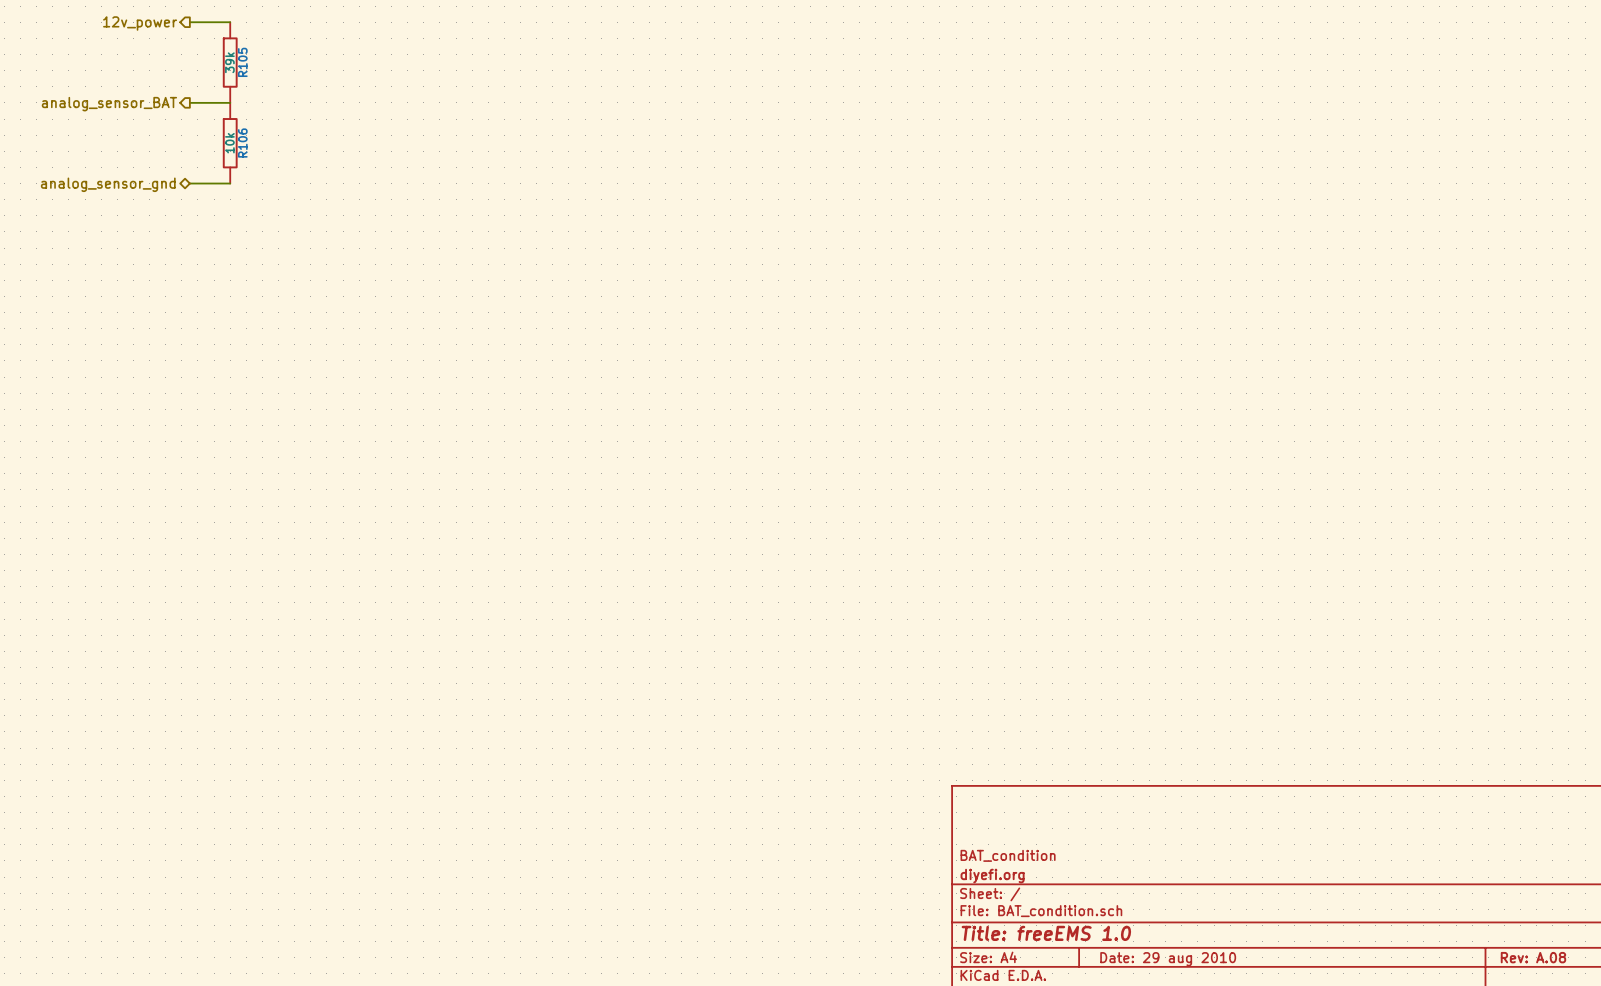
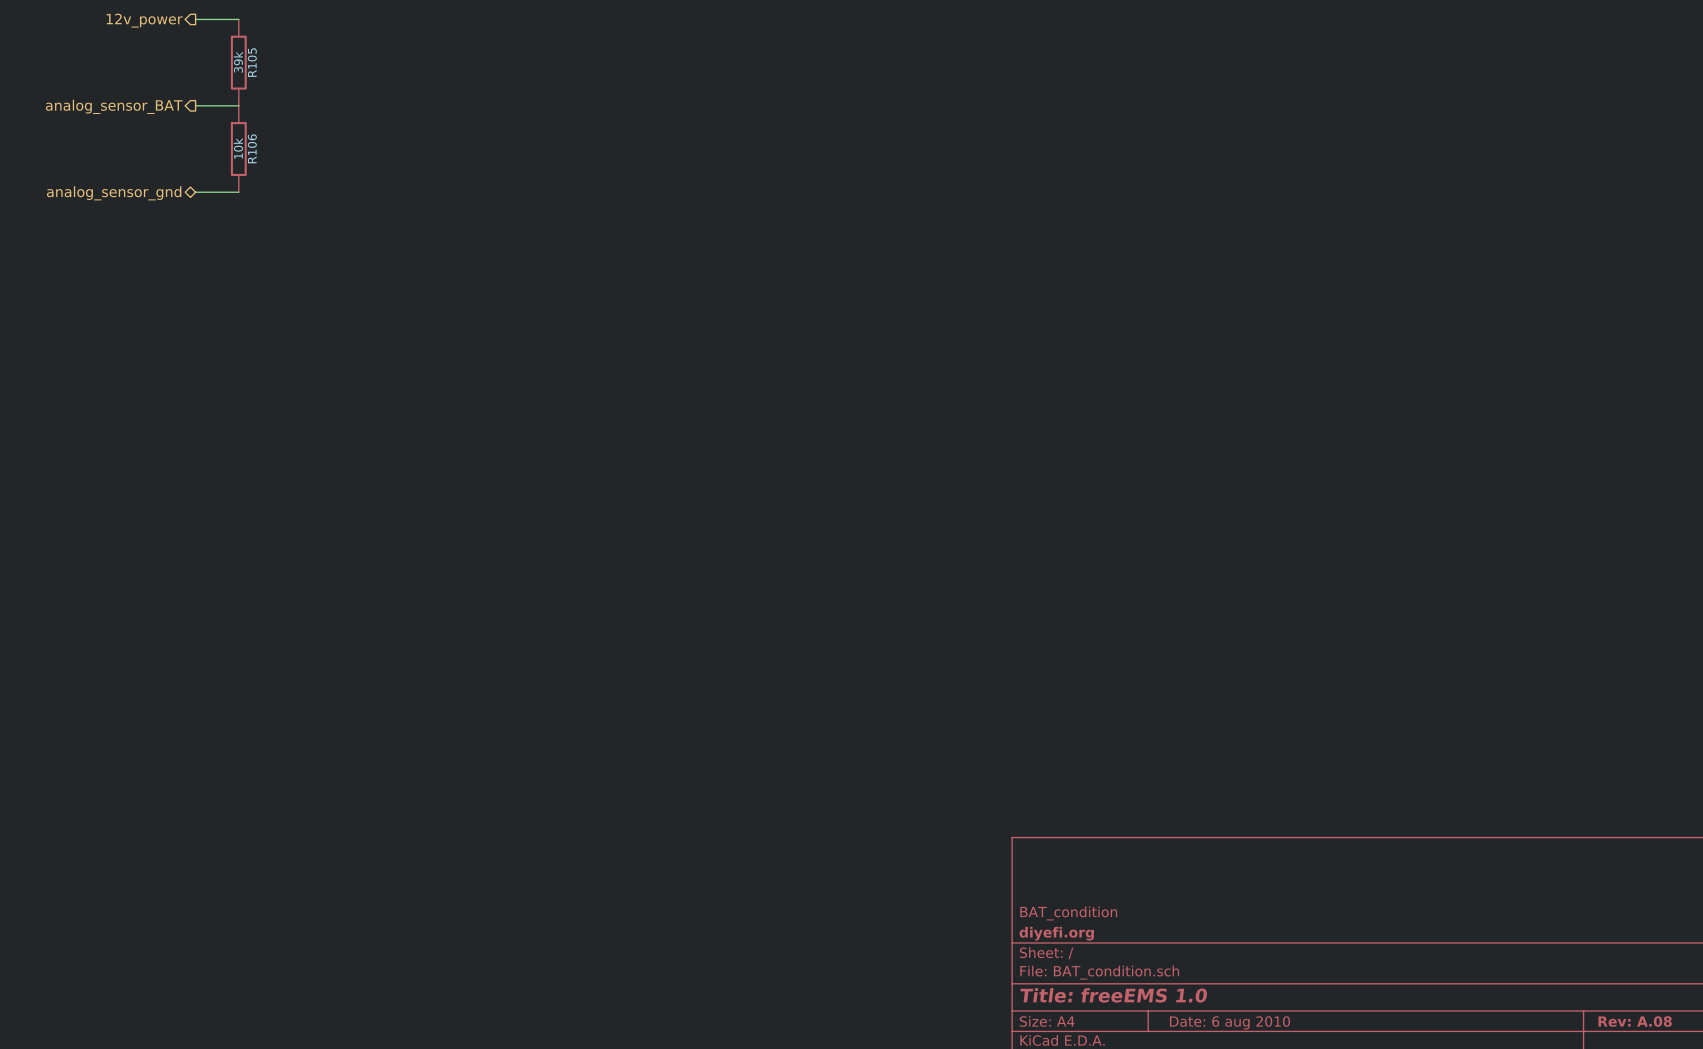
title block: Date: 29 aug 2010 (1168, 959) -> Date: 6 aug 2010 (1230, 1022)

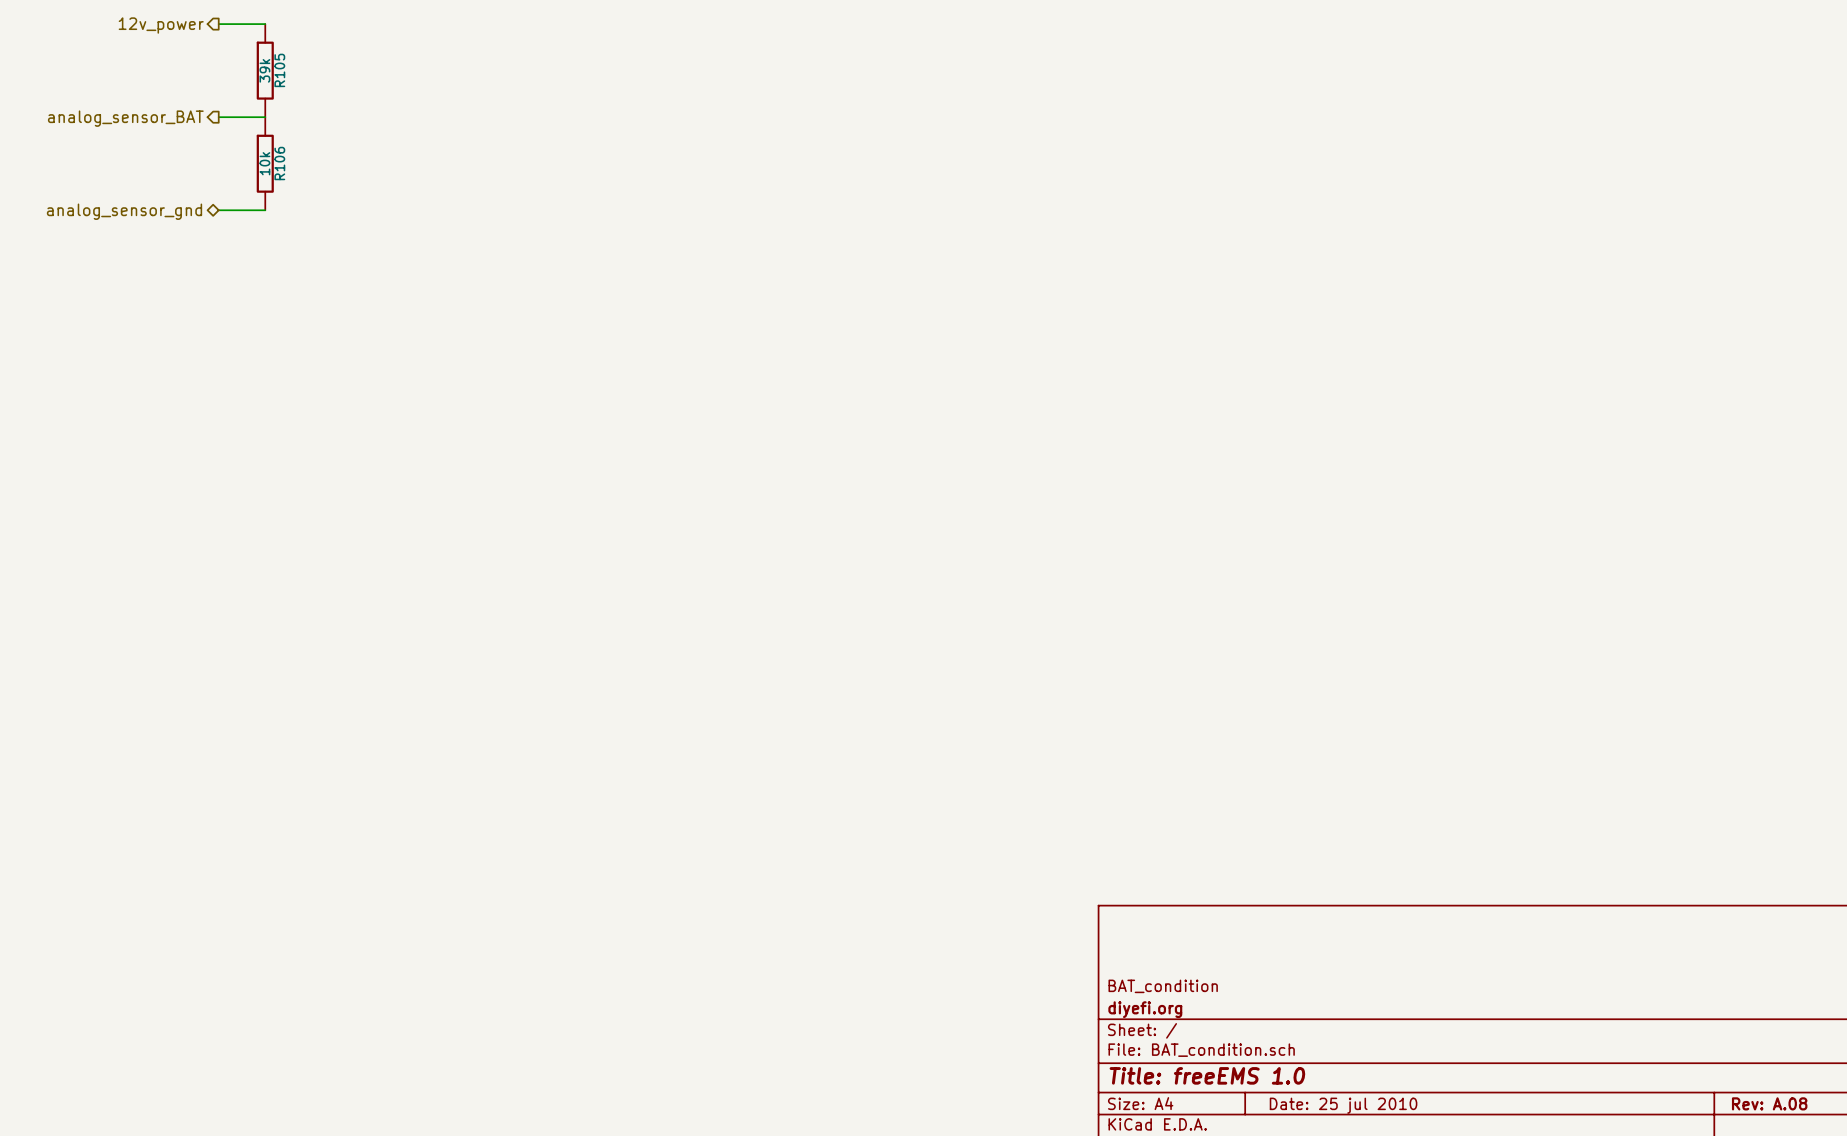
title block: Date: 6 aug 2010 (1230, 1022) -> Date: 25 jul 2010 (1343, 1105)

